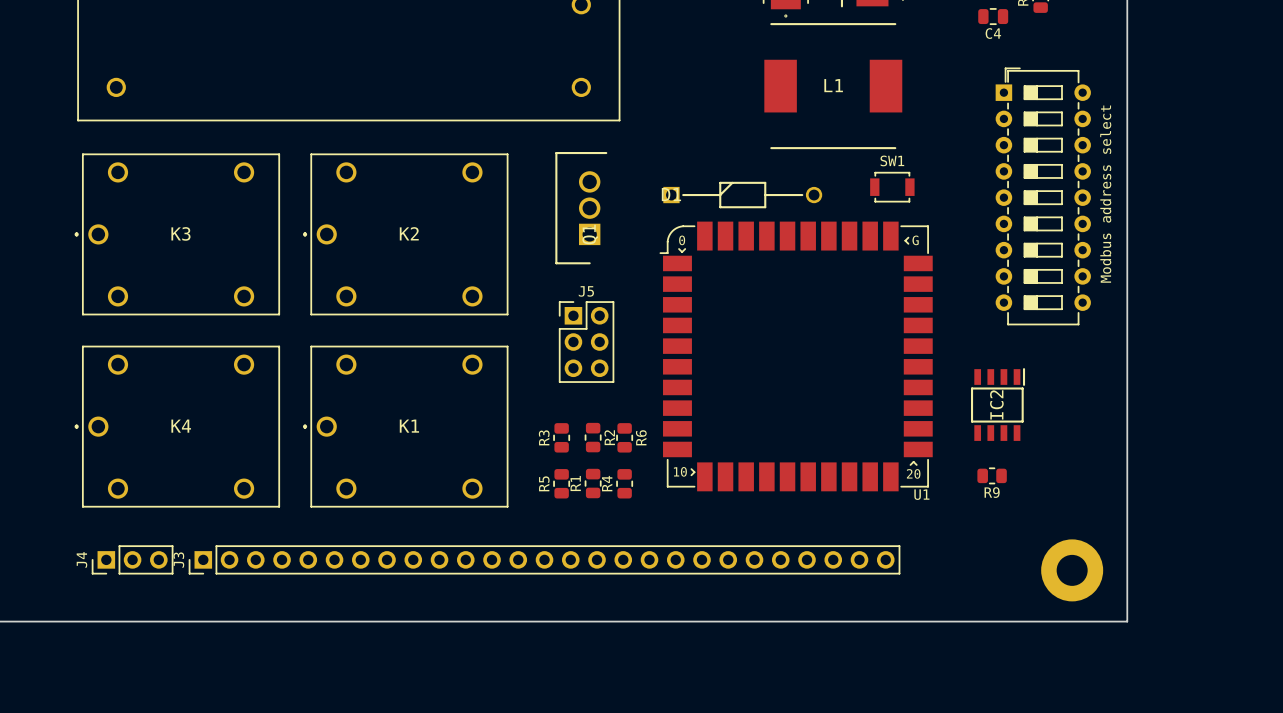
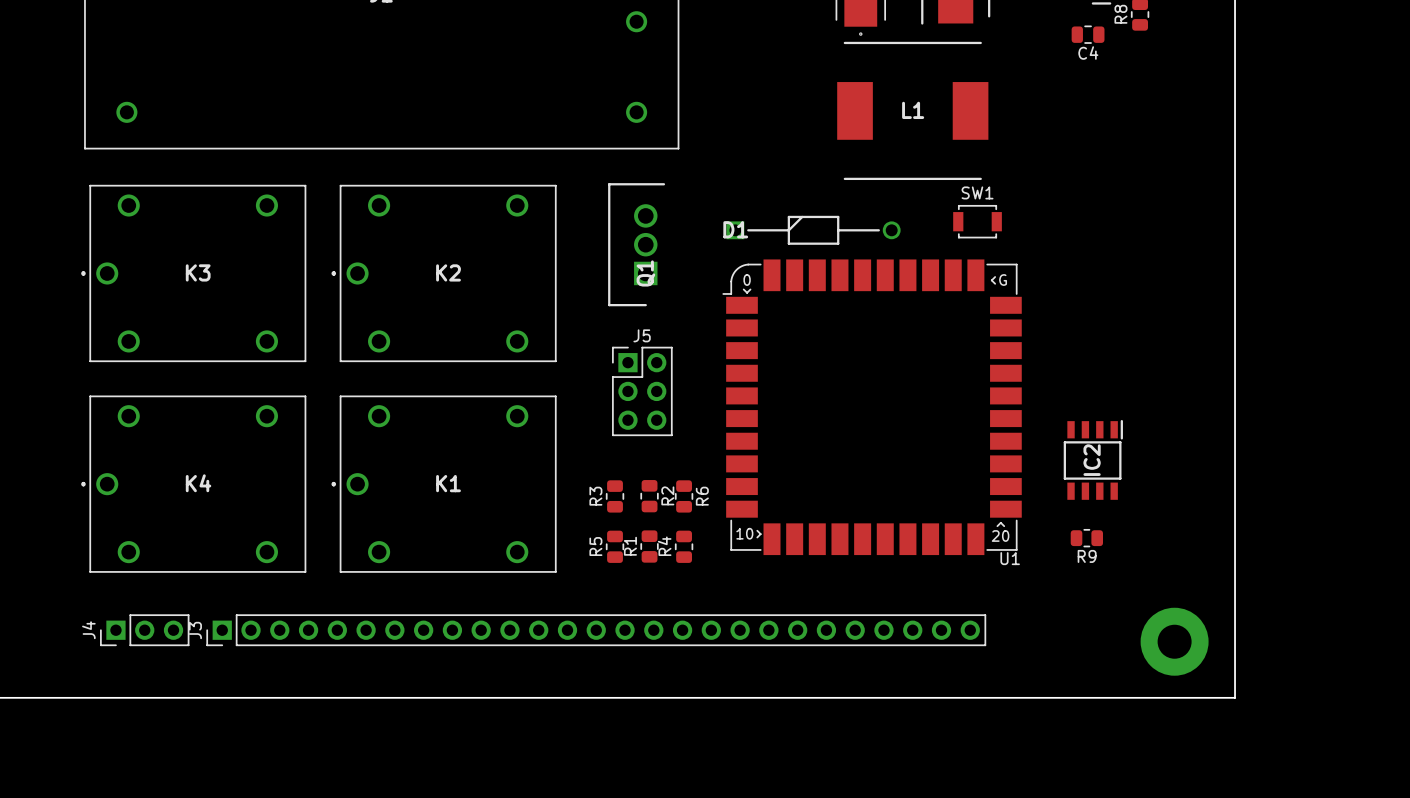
Modbus address select: (1043, 196) -> none

